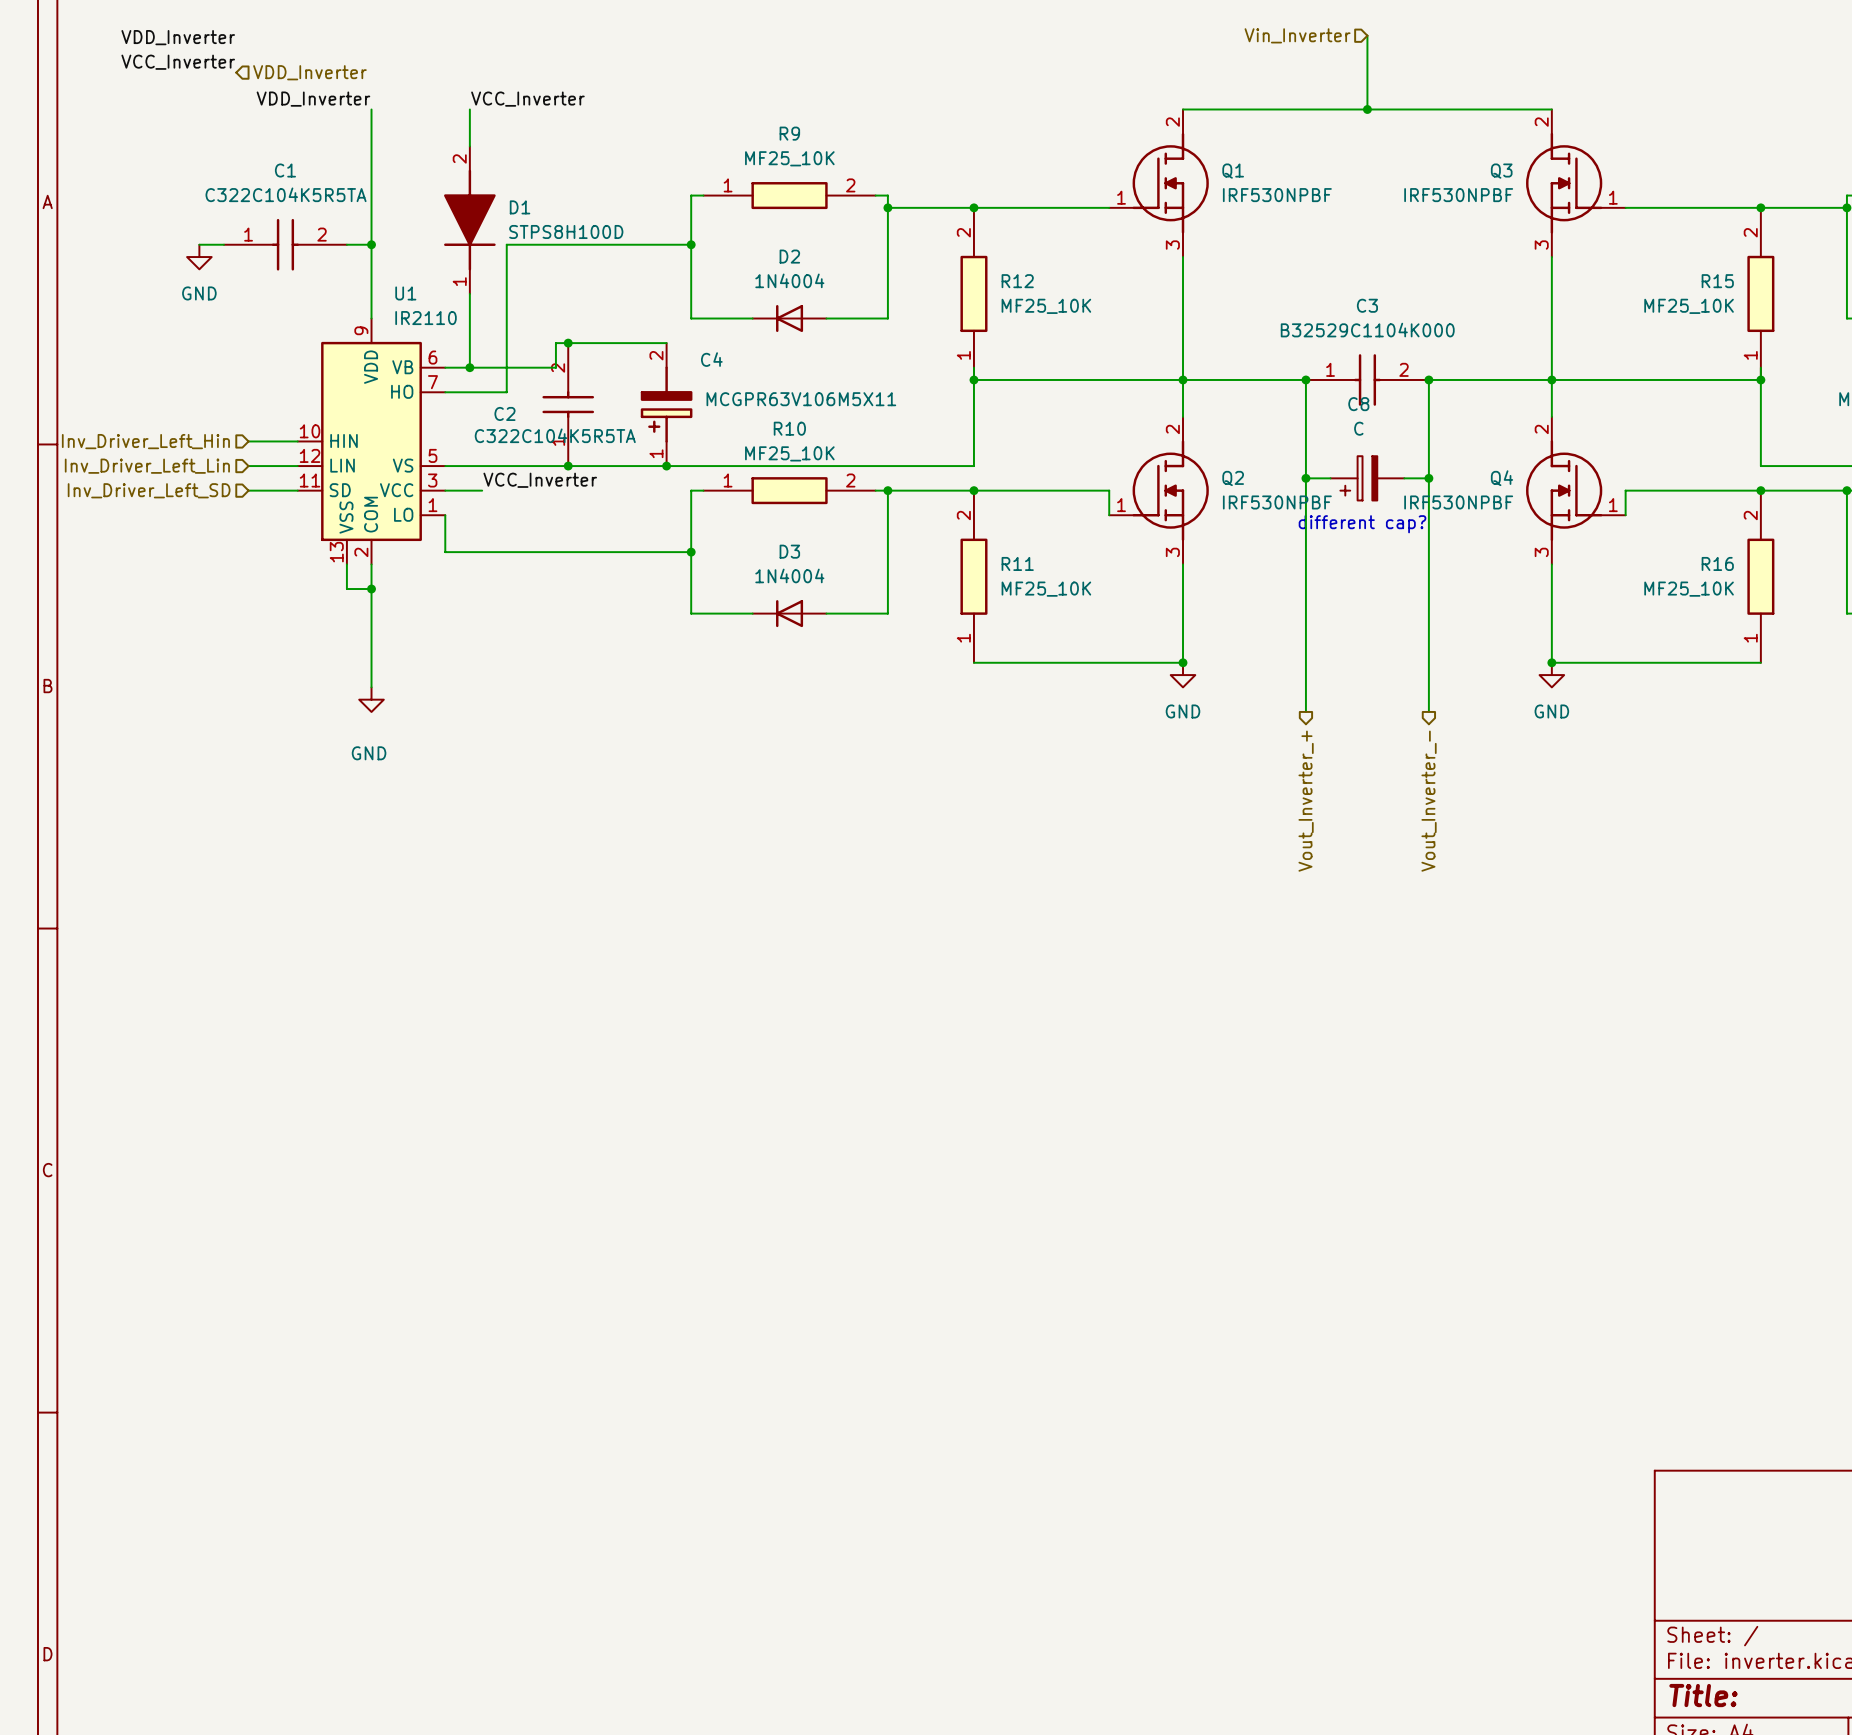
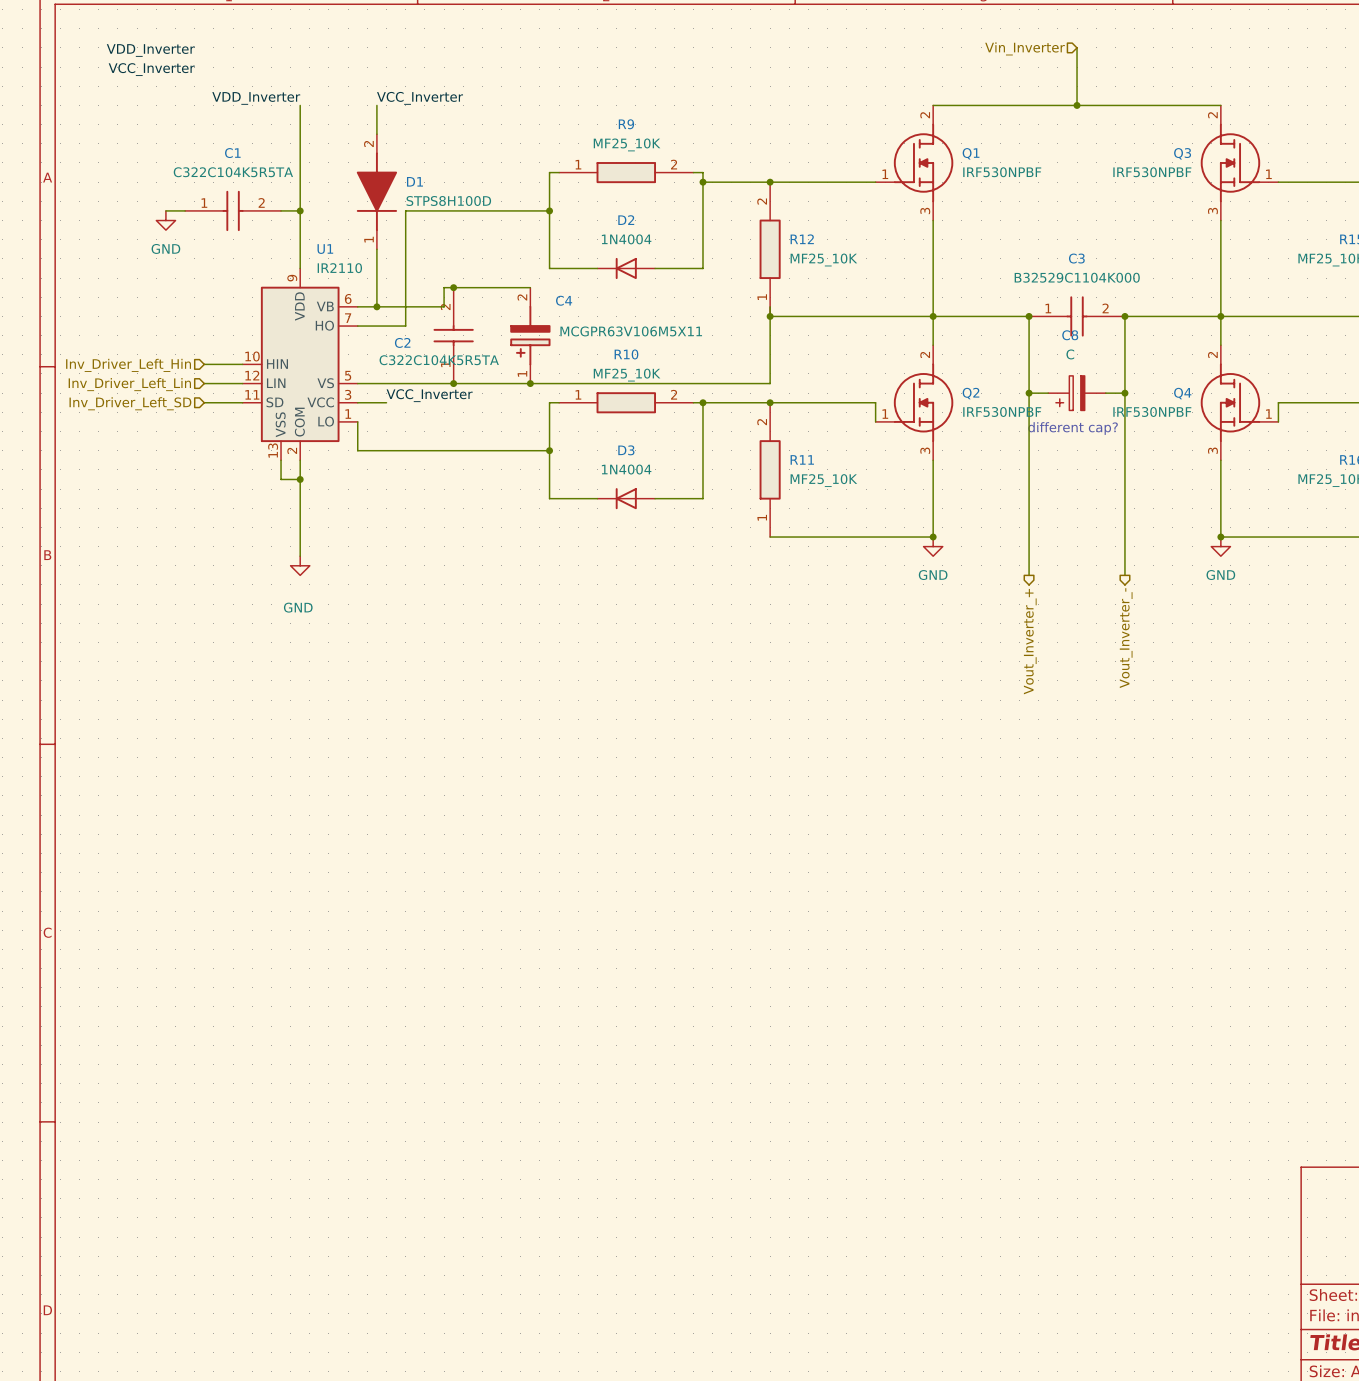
hierarchical label: VDD_Inverter (309, 72) -> none

